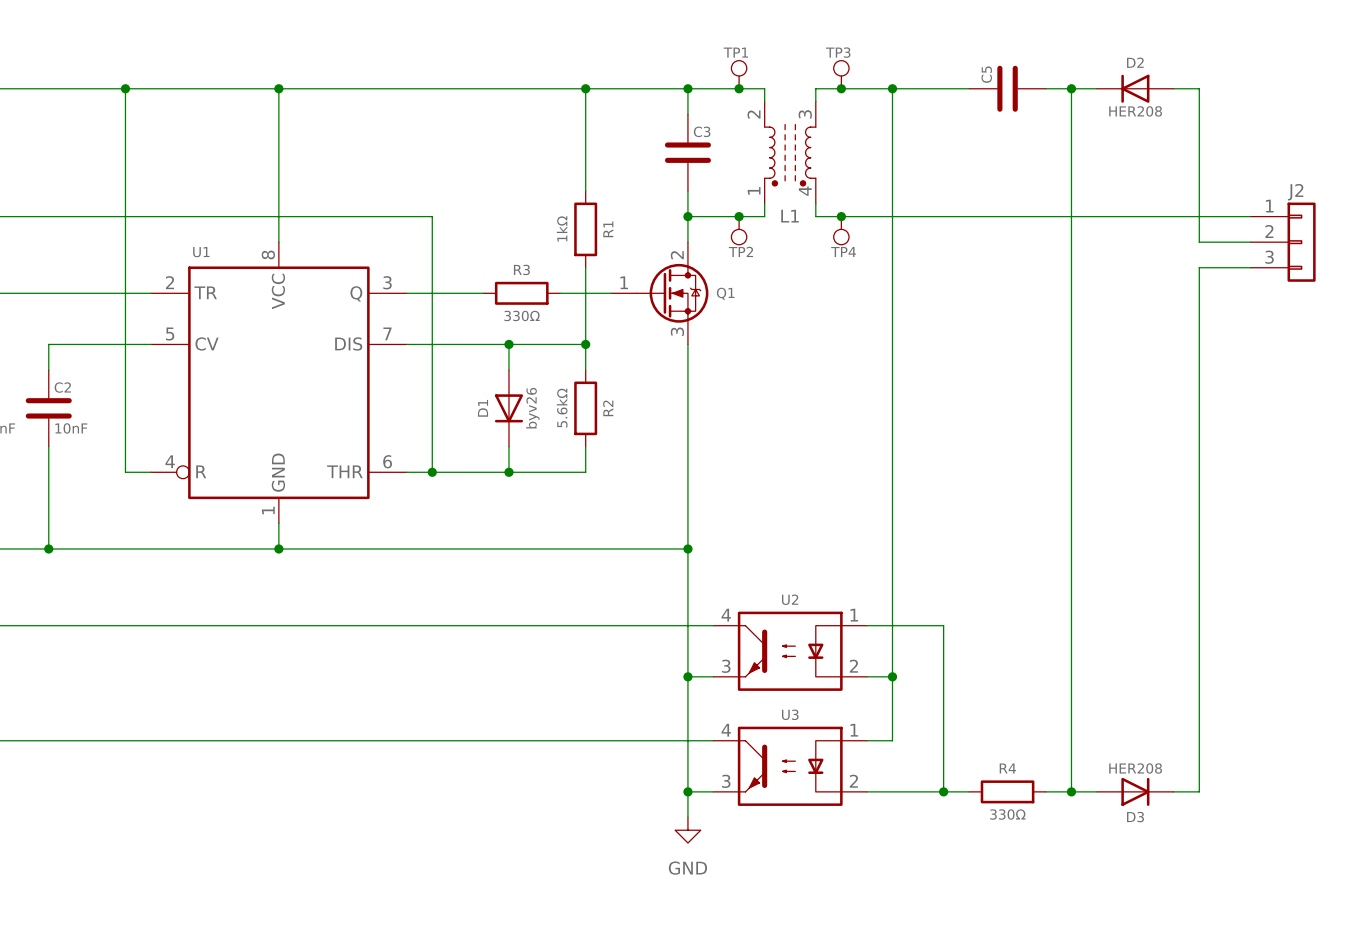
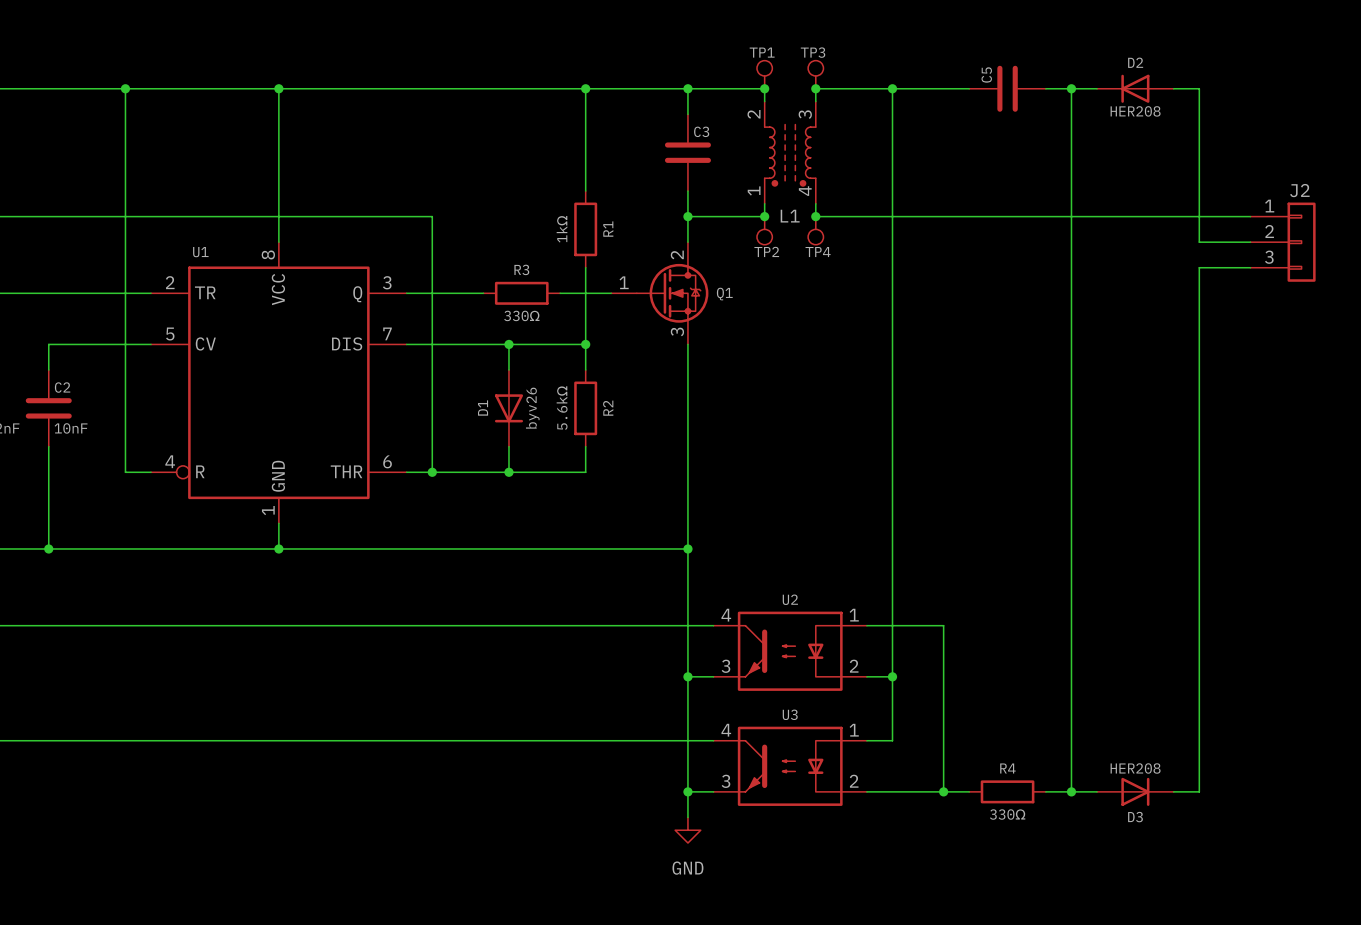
TP1 position: (739, 74) -> (764, 74)
TP3 position: (841, 74) -> (815, 74)
junction position: (739, 88) -> (764, 88)
junction position: (841, 88) -> (815, 88)
junction position: (739, 216) -> (764, 216)
junction position: (841, 216) -> (815, 216)
TP2 position: (739, 230) -> (764, 230)
TP4 position: (841, 230) -> (815, 230)

